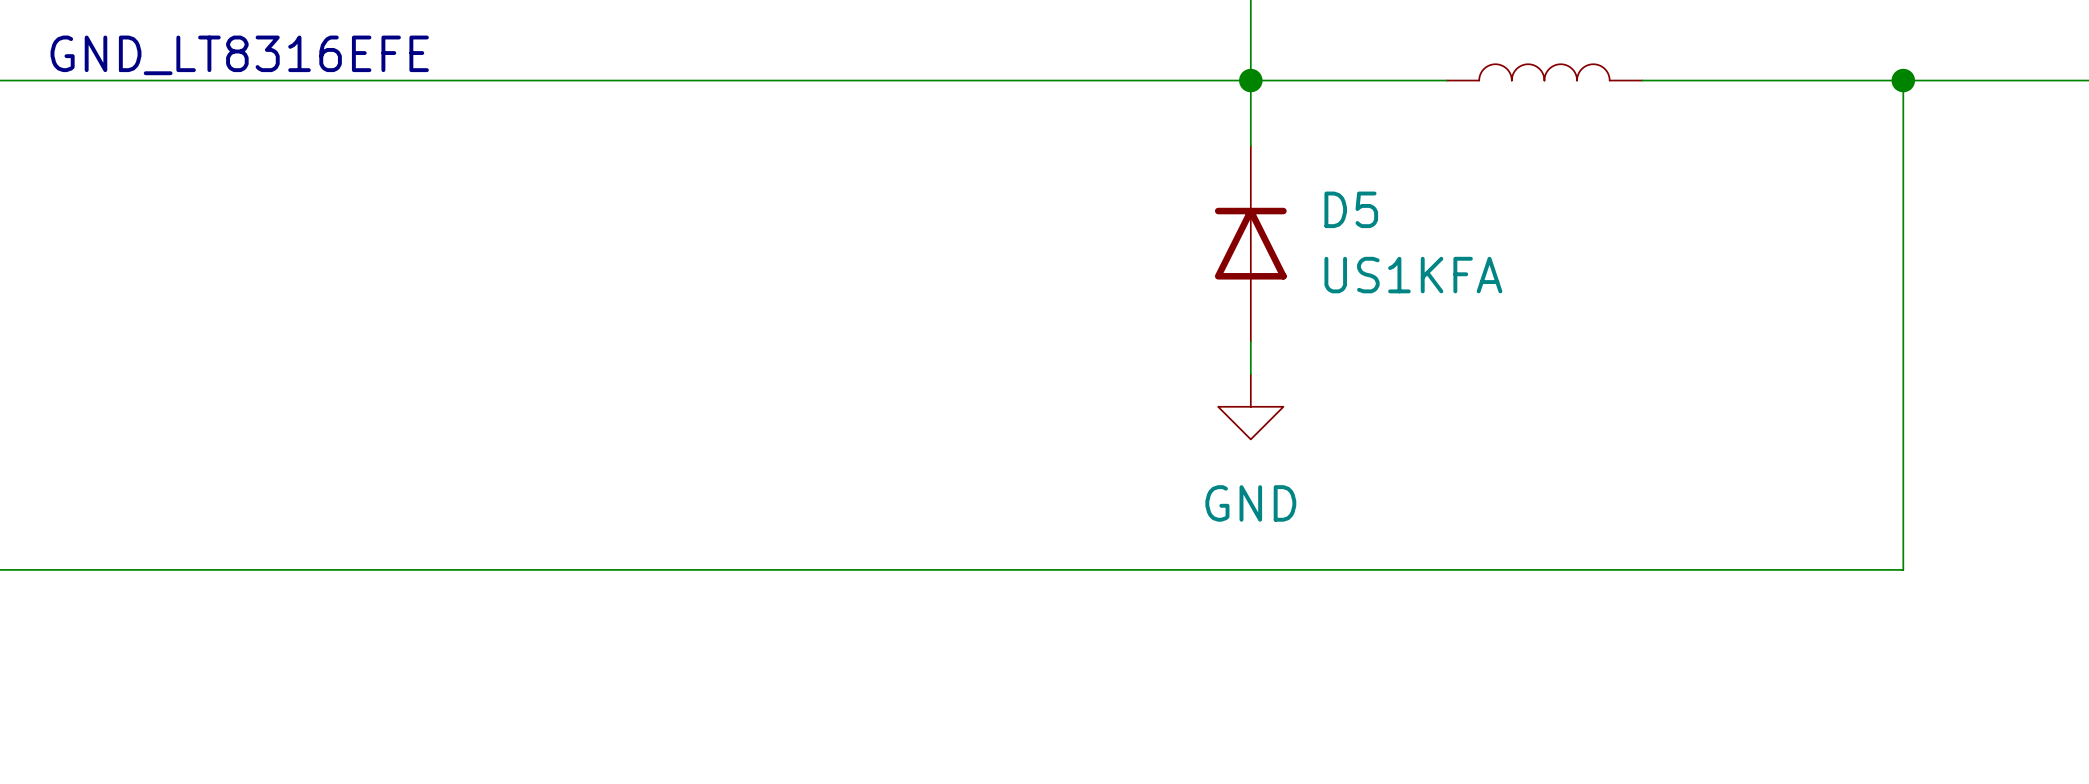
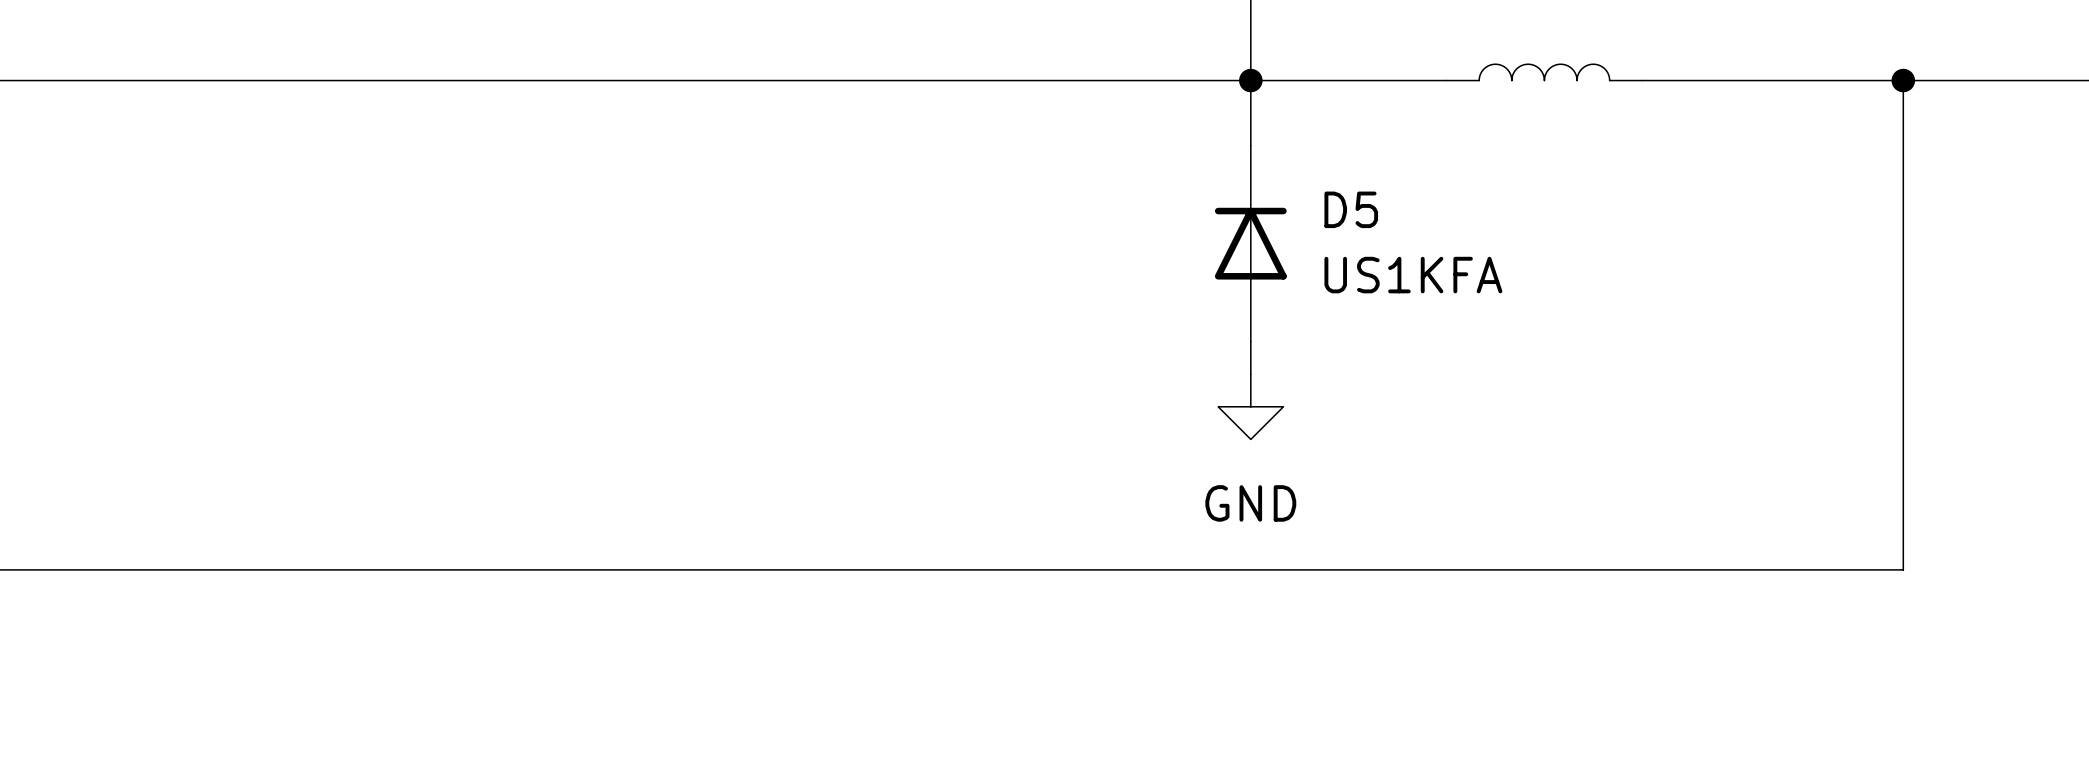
text: GND_LT8316EFE (239, 55) -> none

